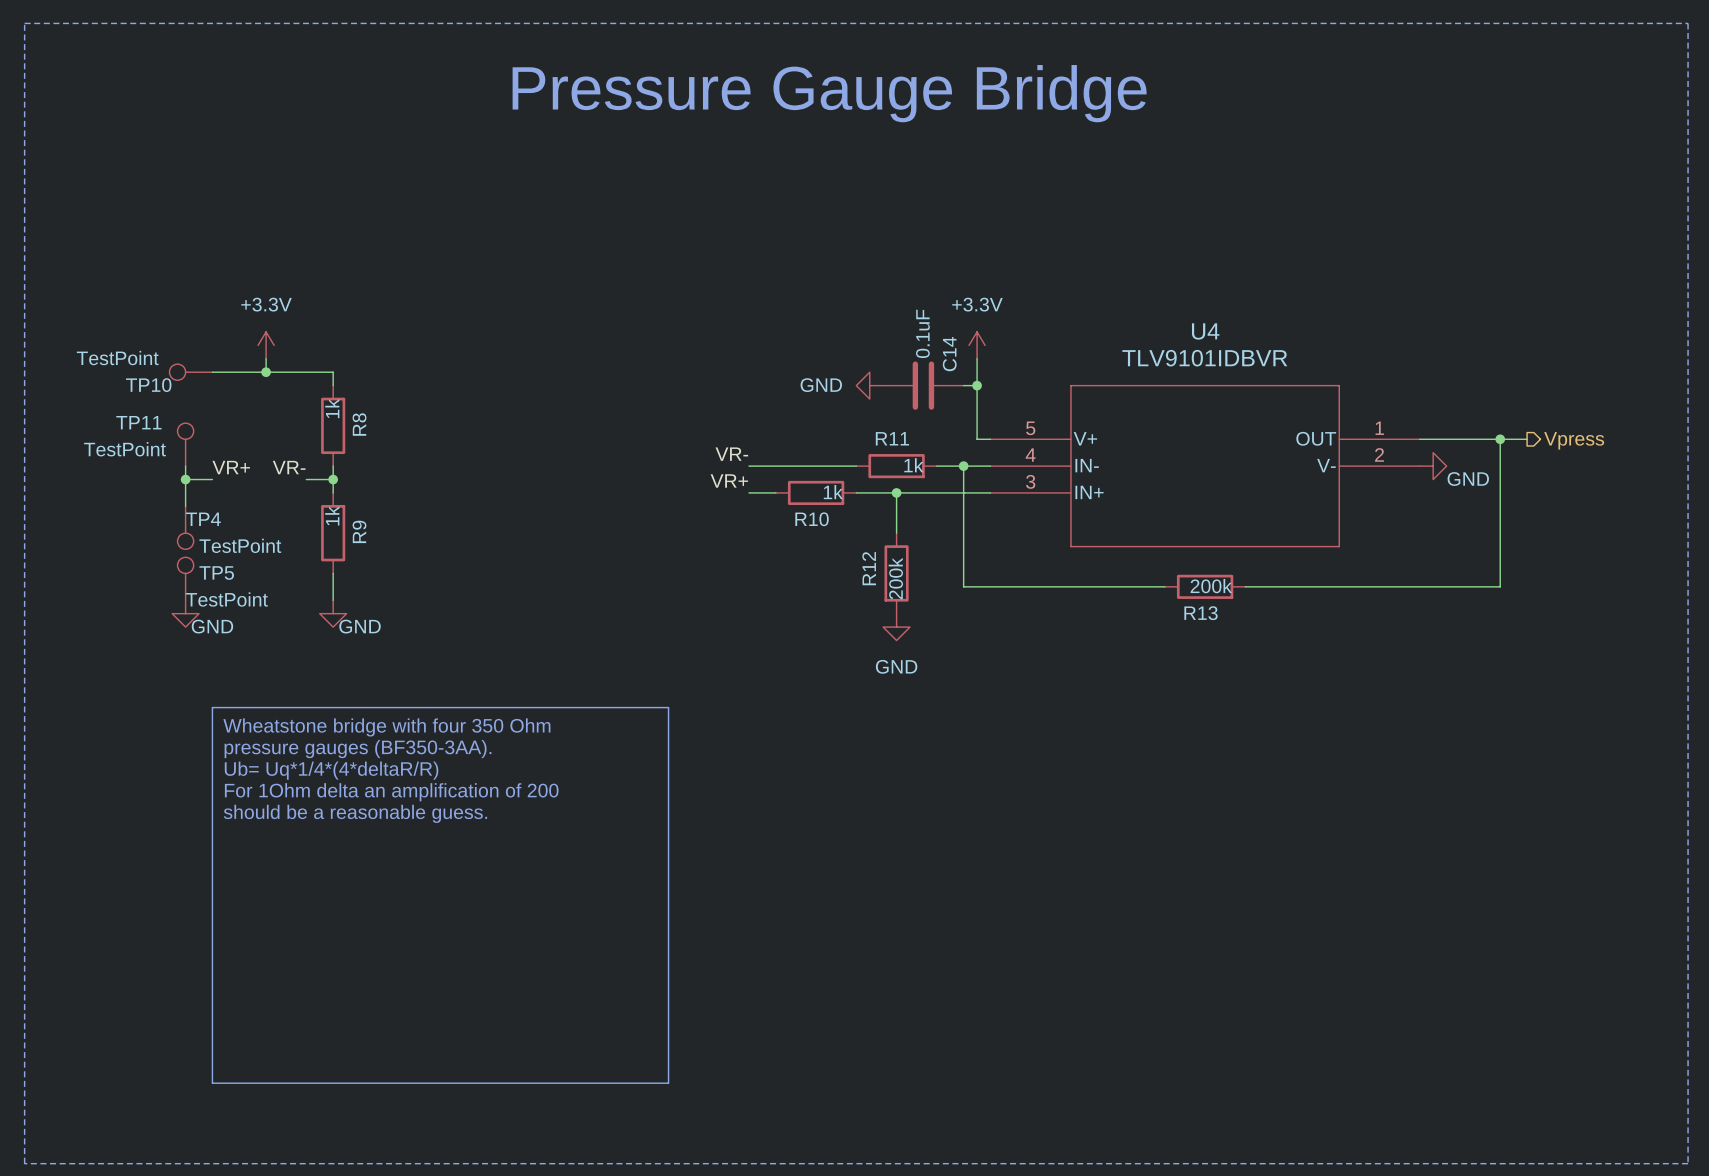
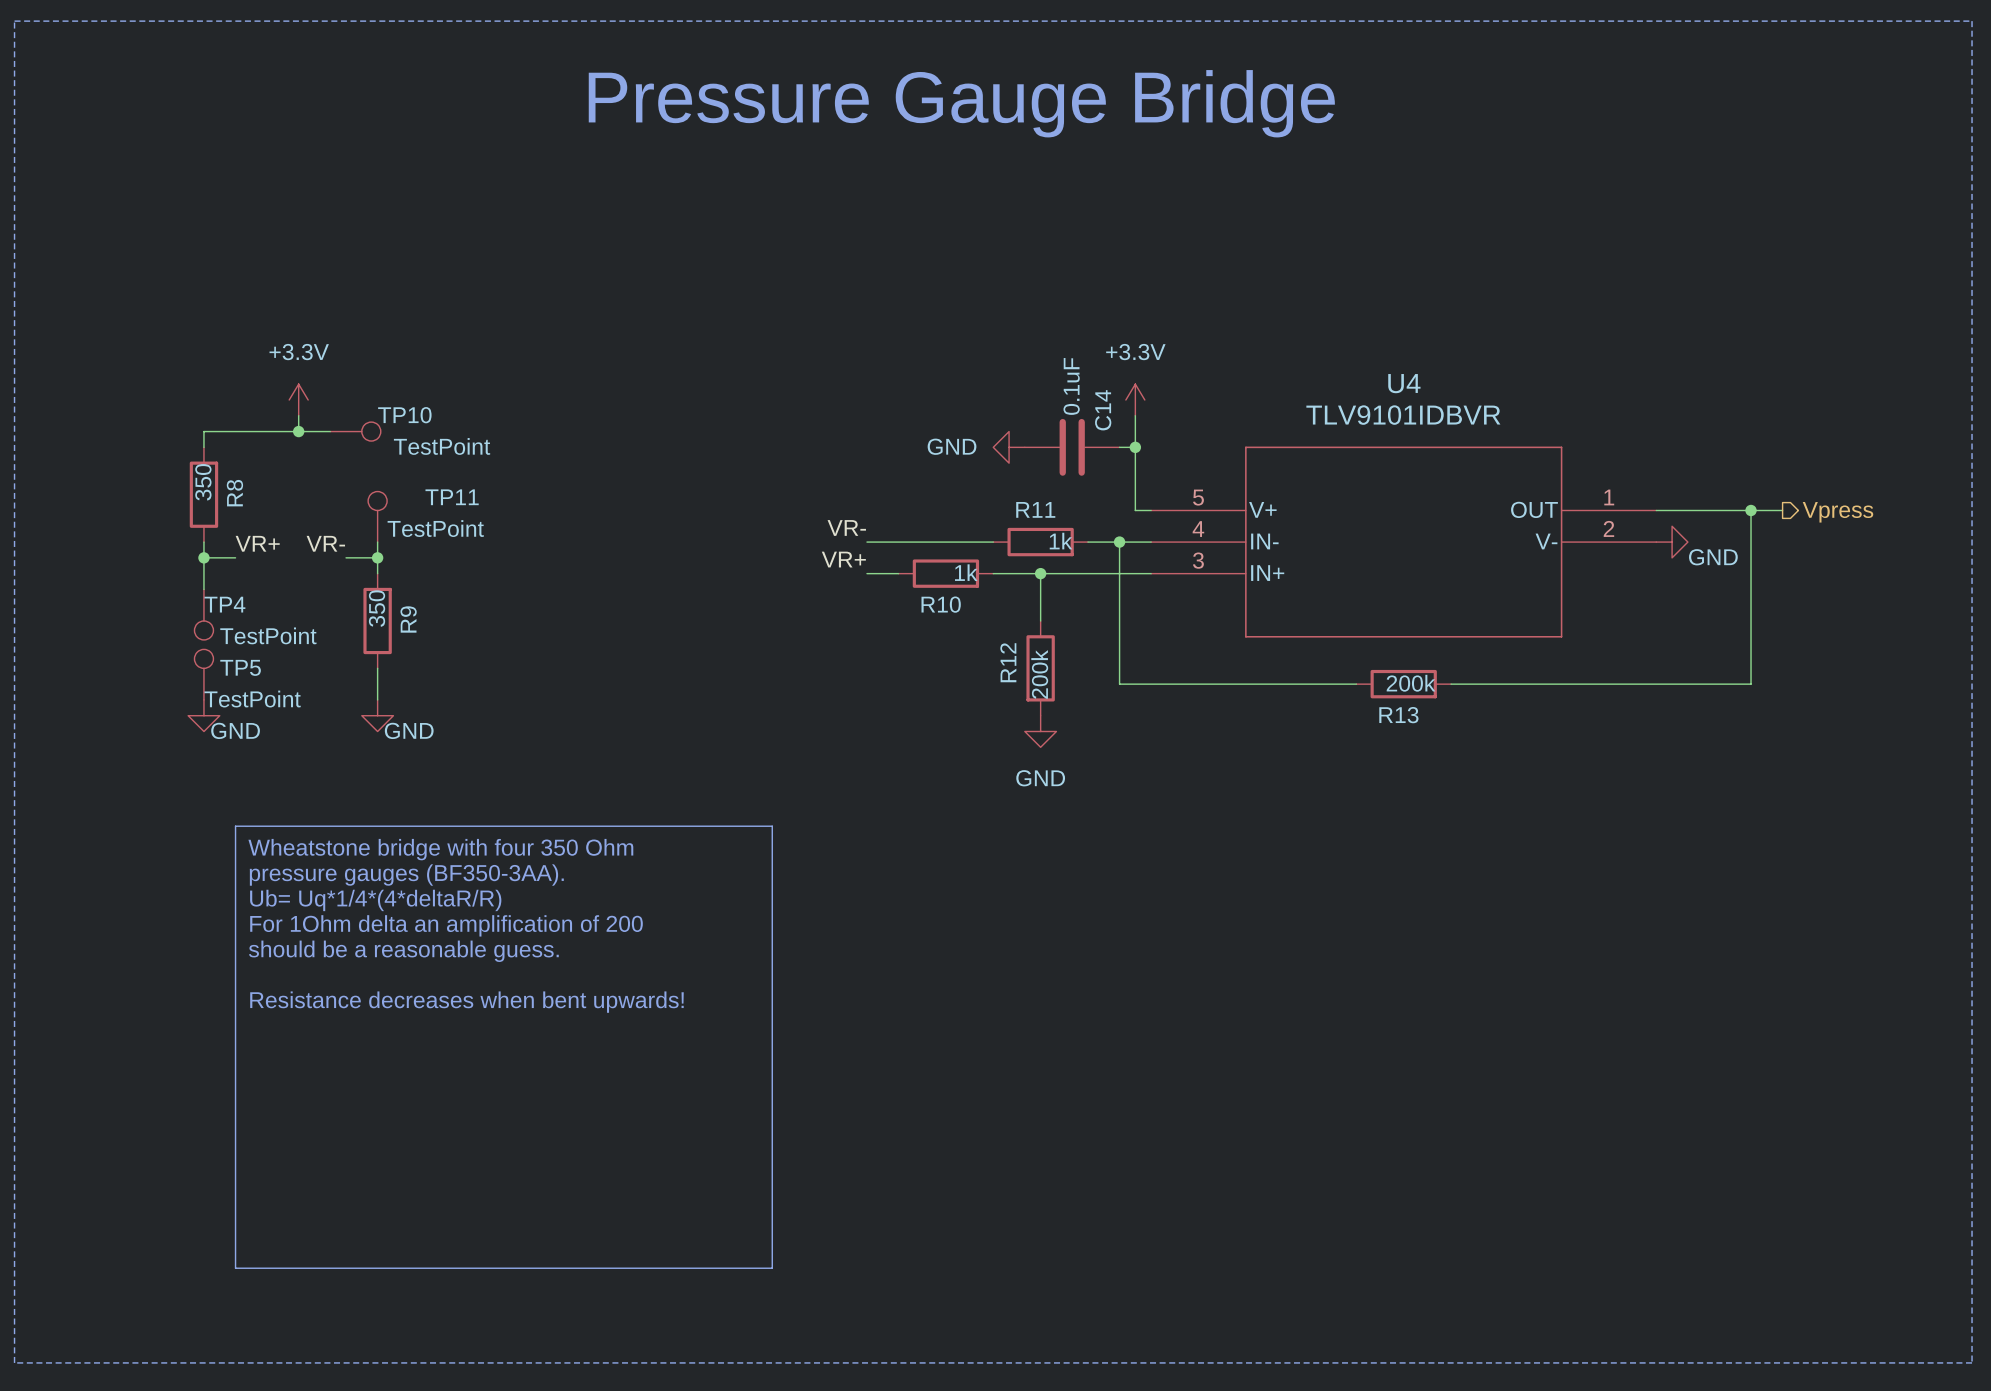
TP10 rotation: 0° (177, 372) -> 180° (371, 431)
TP10 position: (190, 372) -> (355, 431)
wire: (292, 372) (333, 372) (333, 385) -> none
R8 value: 1k (332, 408) -> 350 (203, 482)
TP11 name position: TP11 (138, 422) -> TP11 (452, 497)
R8 position: (333, 425) -> (203, 494)
TP11 position: (185, 444) -> (377, 516)
TP11 value position: TestPoint (124, 449) -> TestPoint (435, 528)
R9 value: 1k (332, 515) -> 350 (377, 608)
text: none -> Resistance decreases when bent upwards! (466, 1002)

